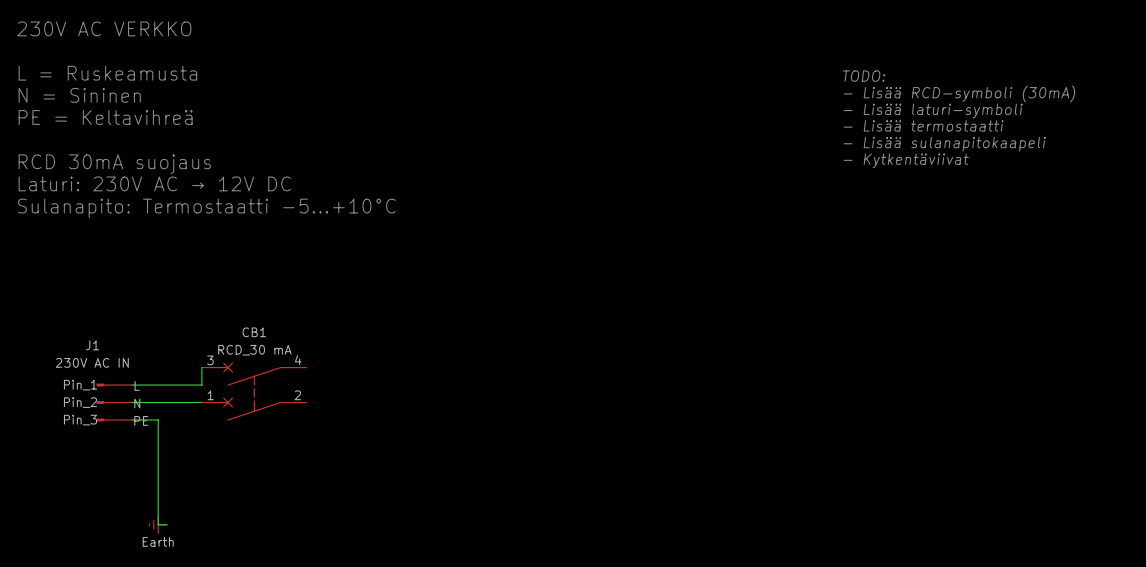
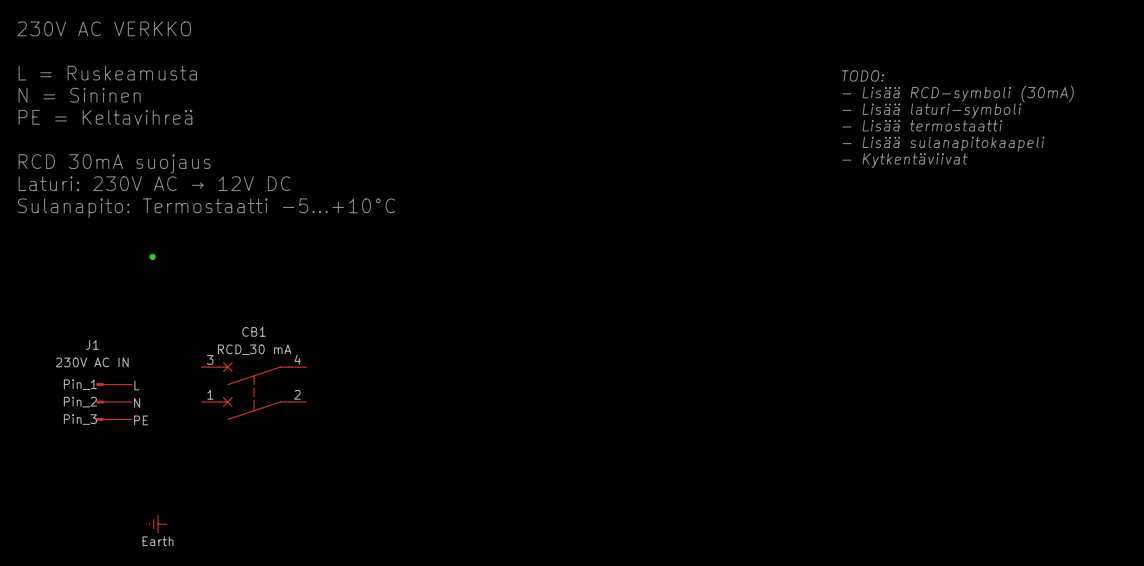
junction: none -> (152, 256)
wire: (201, 367) (201, 385) (132, 385) -> none
wire: (132, 402) (201, 402) -> none
wire: (132, 419) (158, 419) (158, 524) (166, 524) -> none

